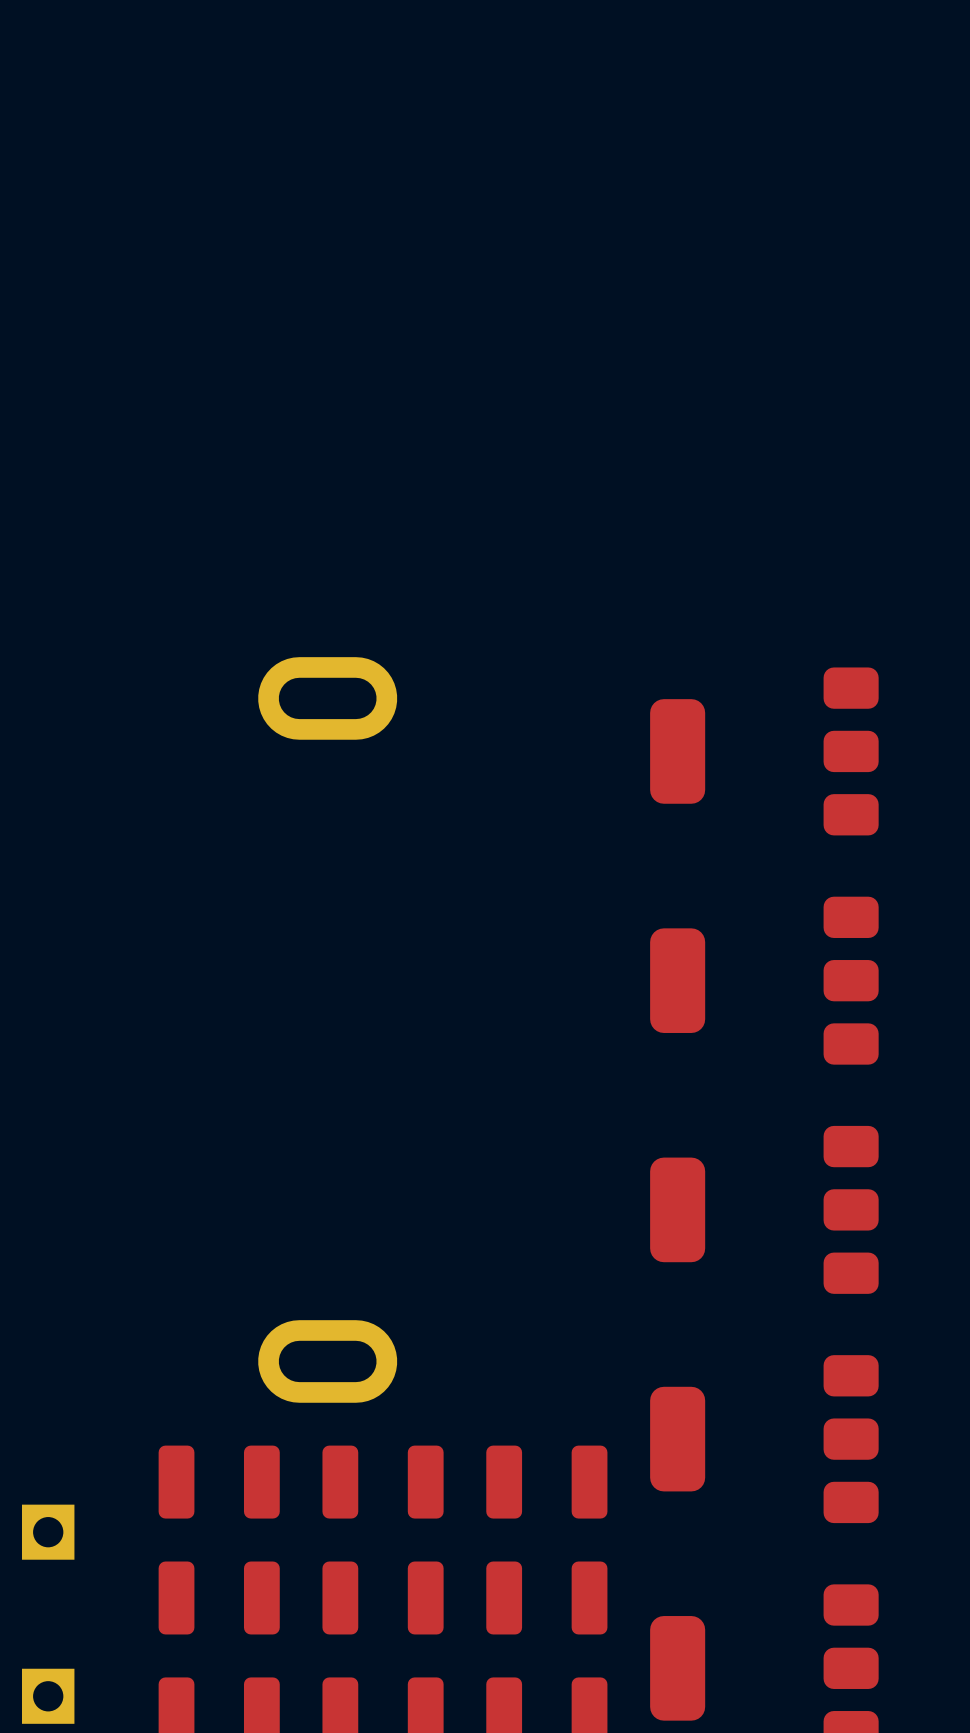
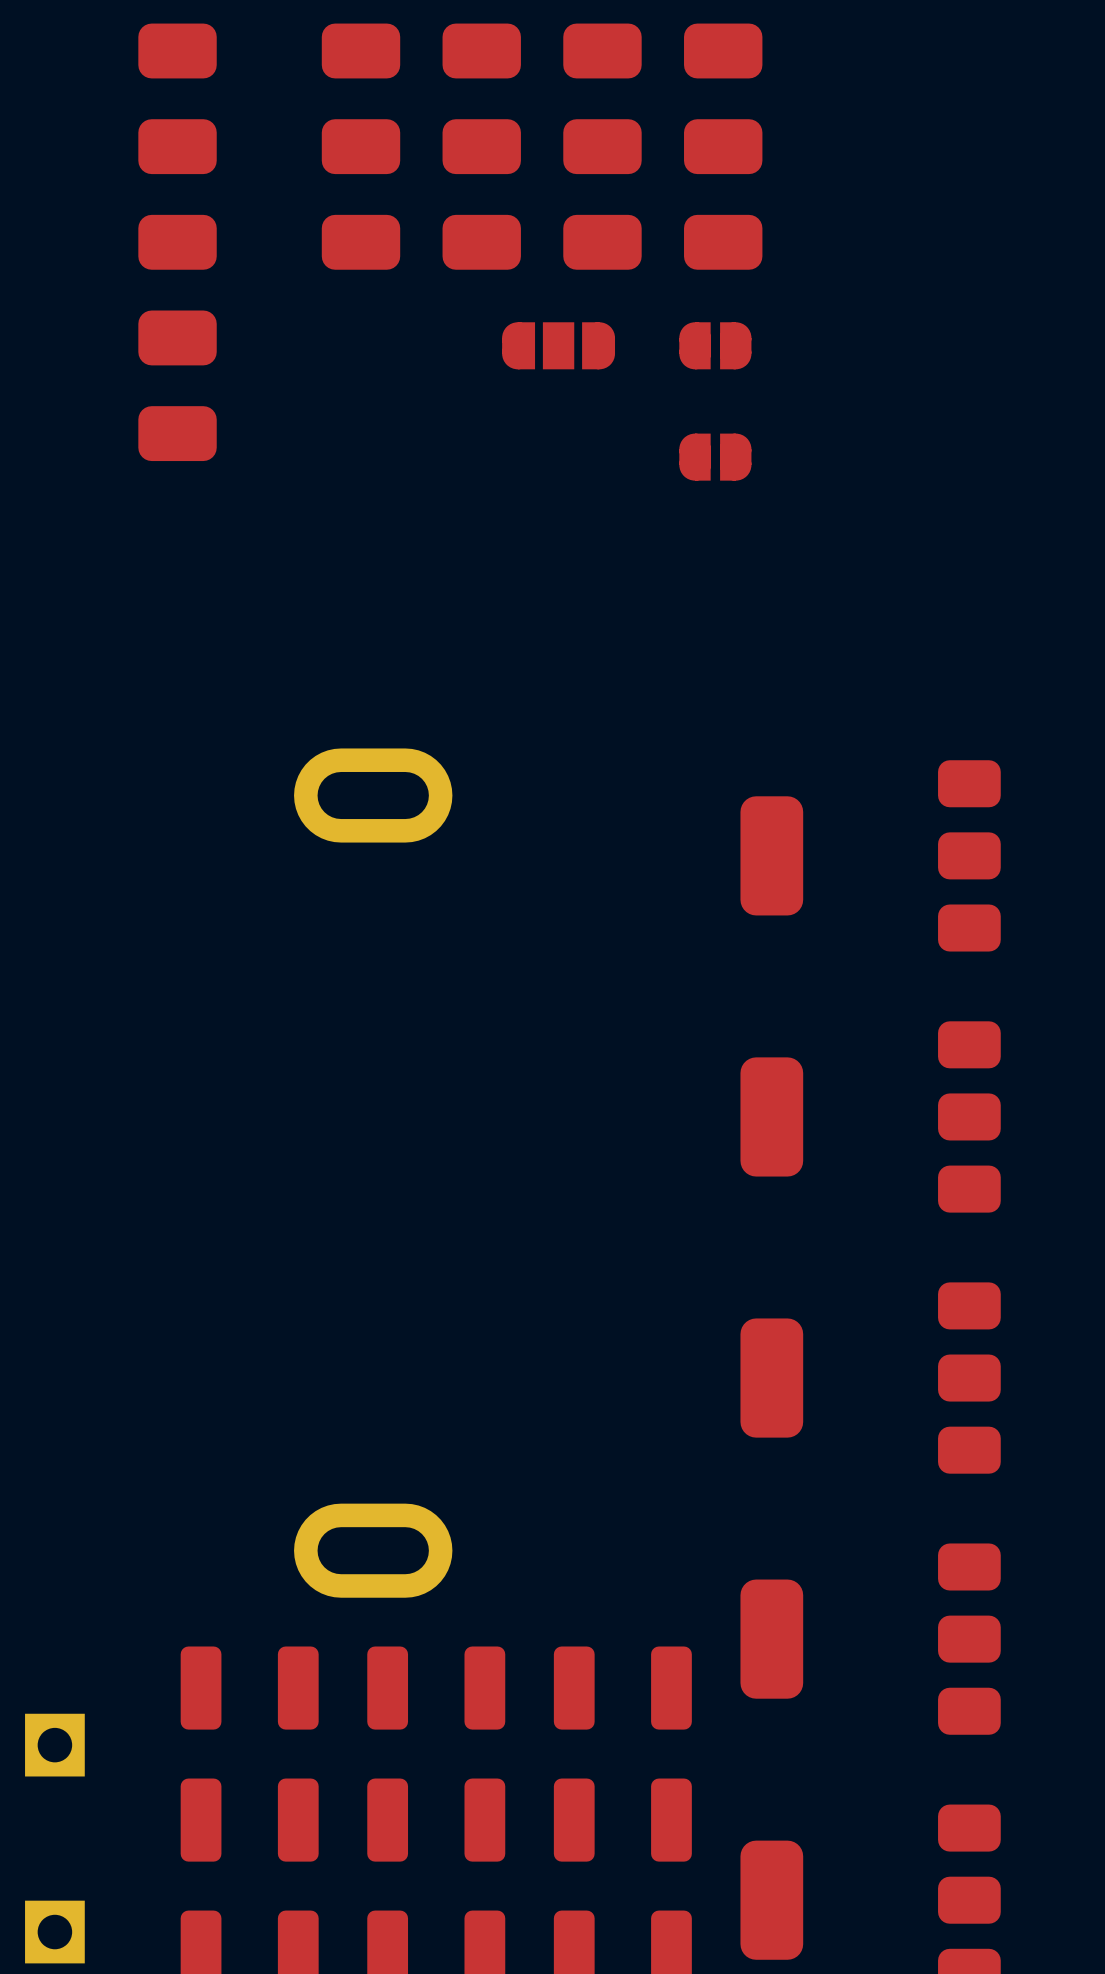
part: none -> (177, 51)
part: none -> (360, 51)
part: none -> (481, 51)
part: none -> (602, 51)
part: none -> (723, 51)
part: none -> (177, 146)
part: none -> (360, 146)
part: none -> (481, 146)
part: none -> (602, 146)
part: none -> (723, 146)
part: none -> (177, 242)
part: none -> (360, 242)
part: none -> (481, 242)
part: none -> (602, 242)
part: none -> (723, 242)
part: none -> (177, 337)
part: none -> (558, 345)
part: none -> (715, 345)
part: none -> (177, 433)
part: none -> (715, 457)

